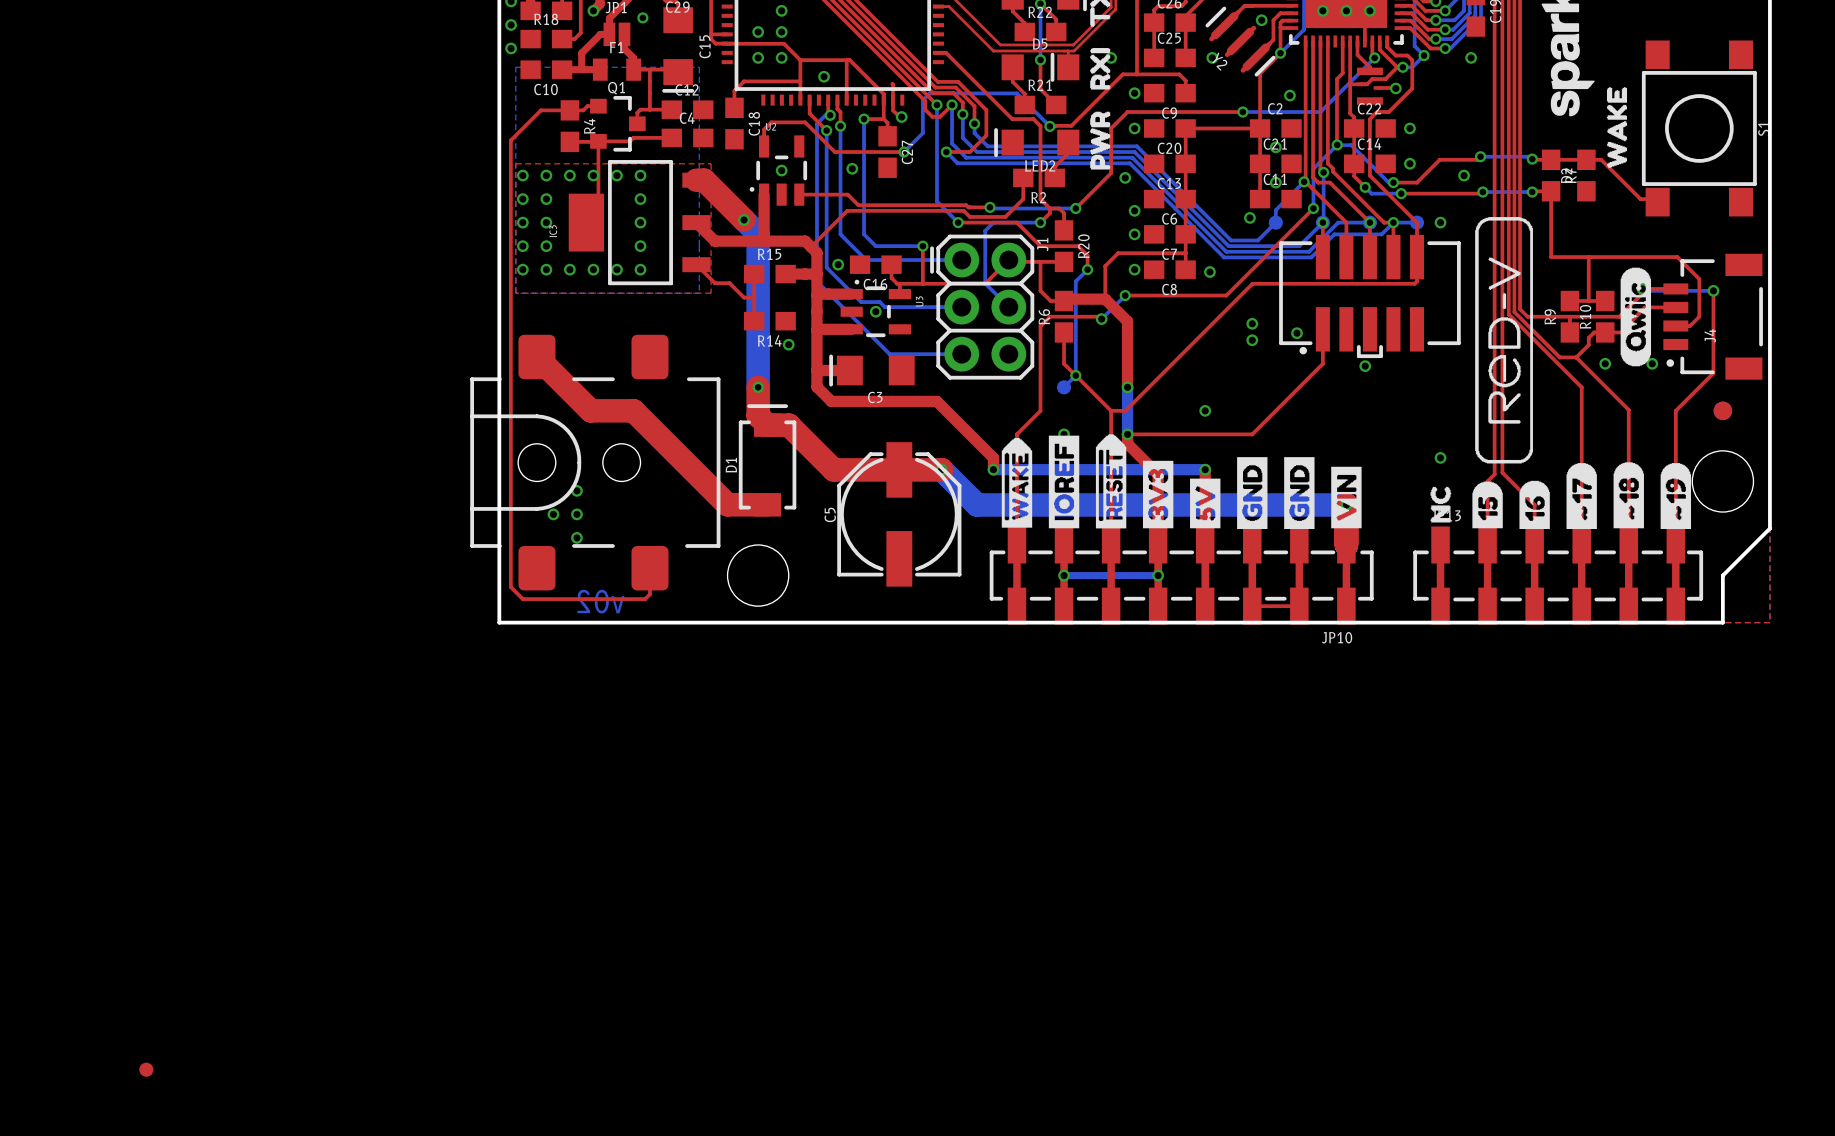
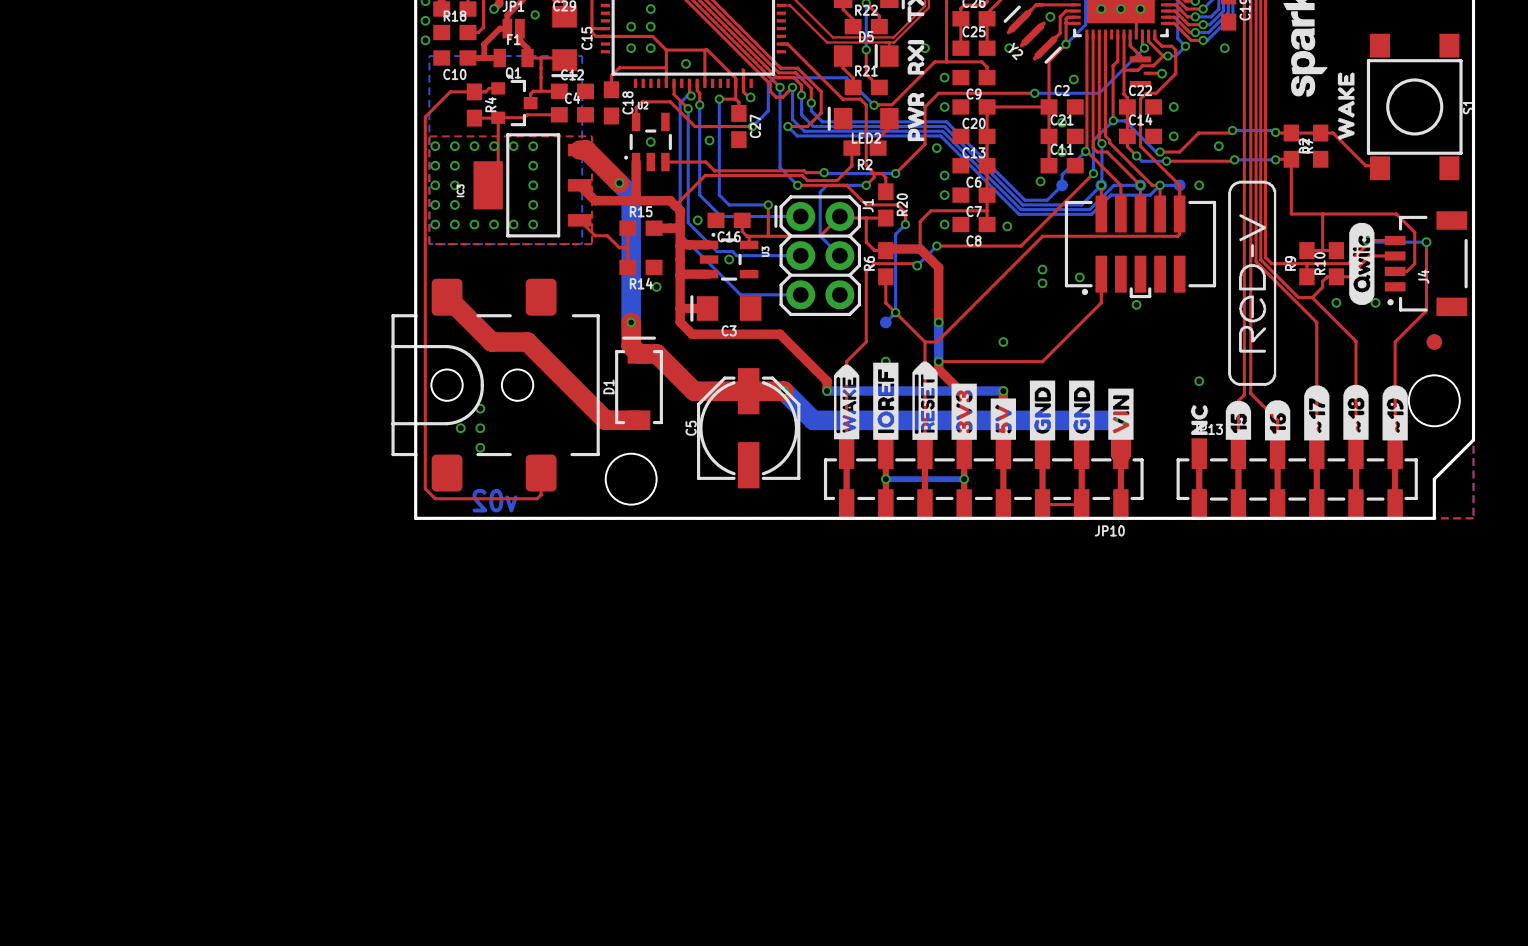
part: (146, 1069) -> none

